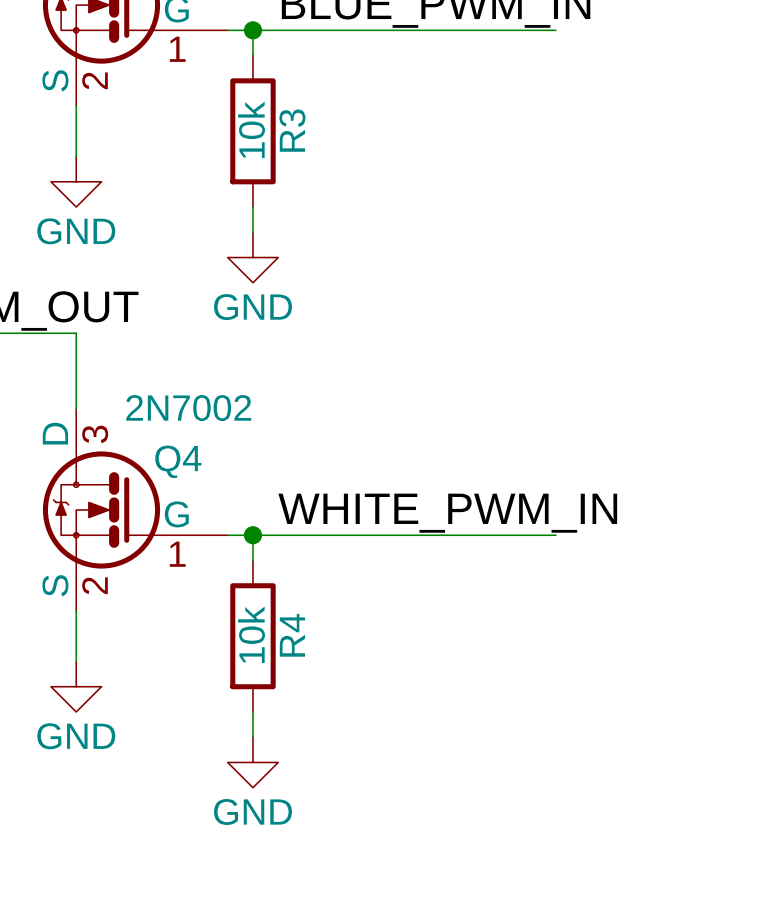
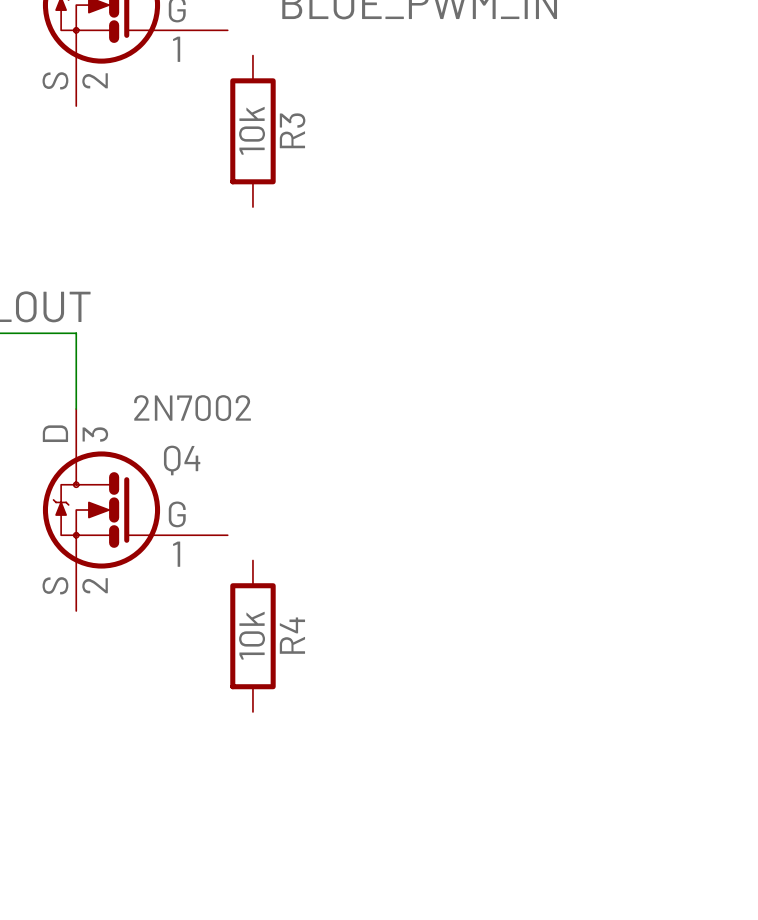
wire: (227, 30) (555, 30) -> none
wire: (252, 30) (252, 55) -> none
junction: (252, 30) -> none
wire: (76, 106) (76, 156) -> none
power symbol: GND (76, 181) -> none
wire: (252, 207) (252, 232) -> none
power symbol: GND (252, 257) -> none
label: WHITE_PWM_IN (447, 513) -> none
wire: (227, 535) (555, 535) -> none
wire: (252, 535) (252, 560) -> none
junction: (252, 535) -> none
wire: (76, 610) (76, 661) -> none
power symbol: GND (76, 686) -> none
wire: (252, 711) (252, 737) -> none
power symbol: GND (252, 762) -> none

